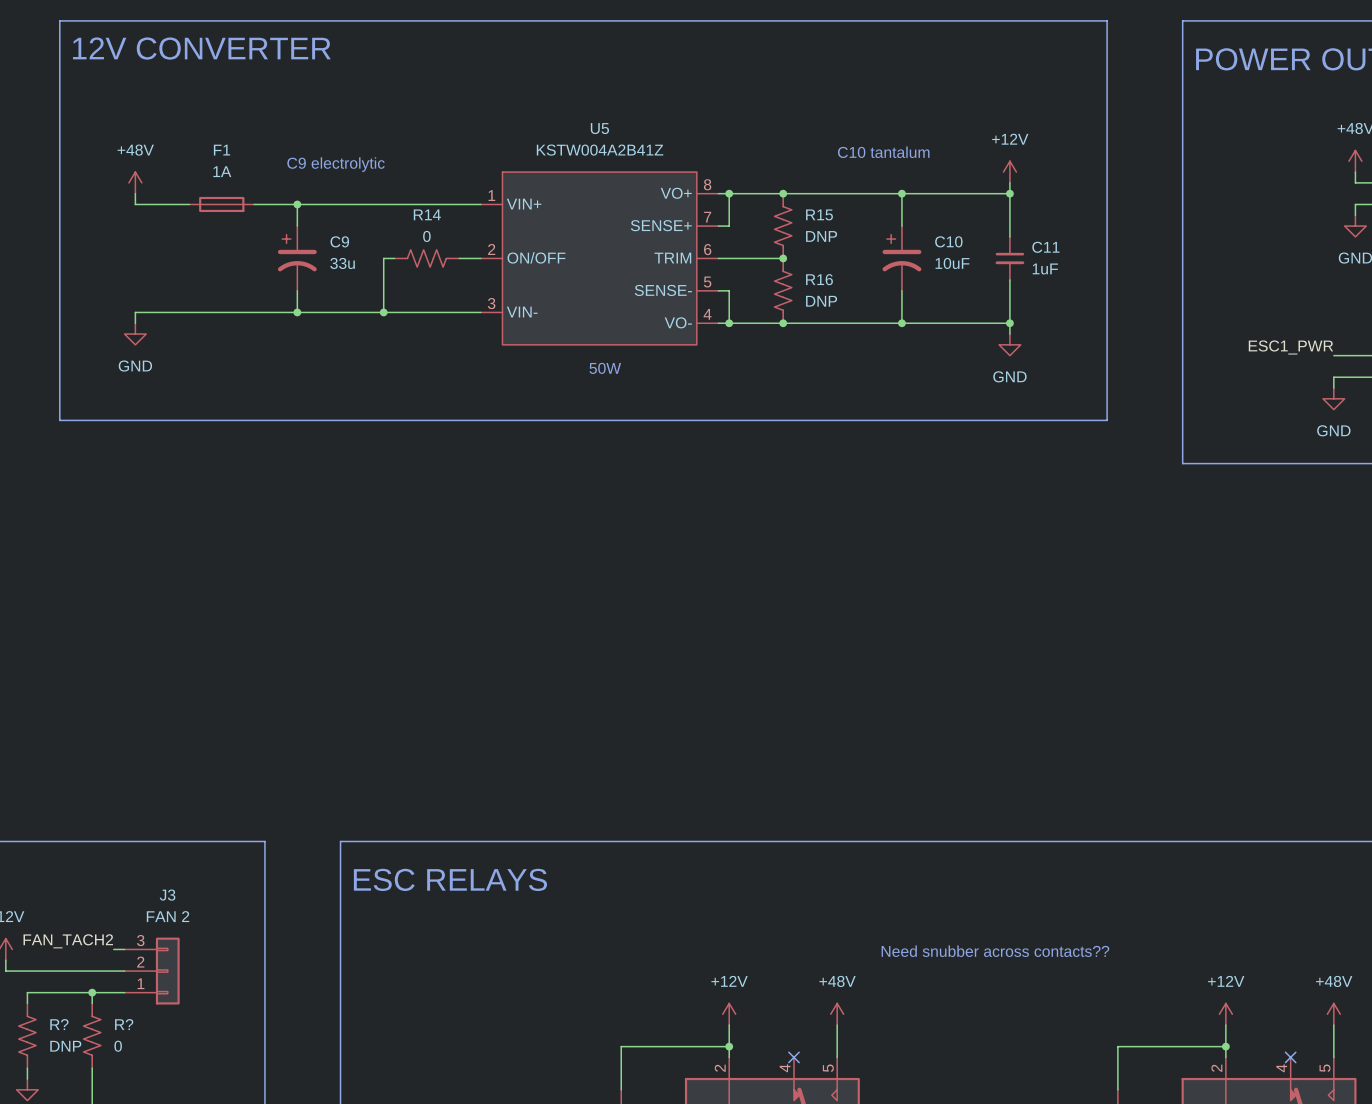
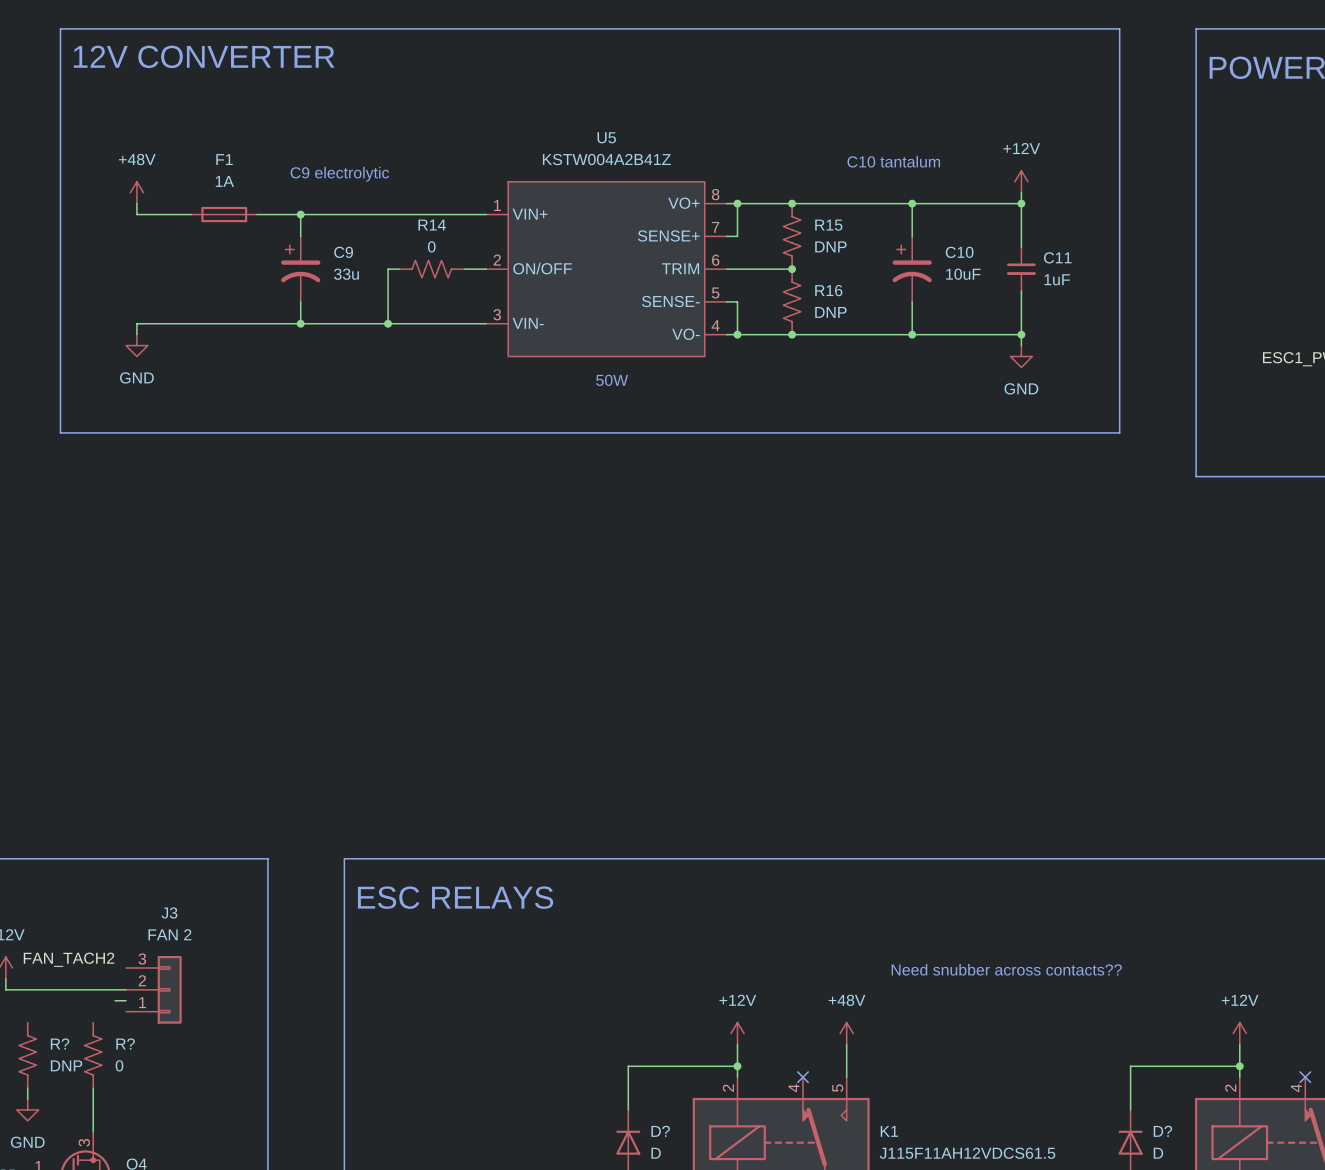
wire: (113, 949) (124, 949) -> (115, 1000) (126, 1000)
wire: (92, 992) (92, 1003) -> none
junction: (92, 992) -> none
wire: (124, 992) (27, 992) (27, 1003) -> none

